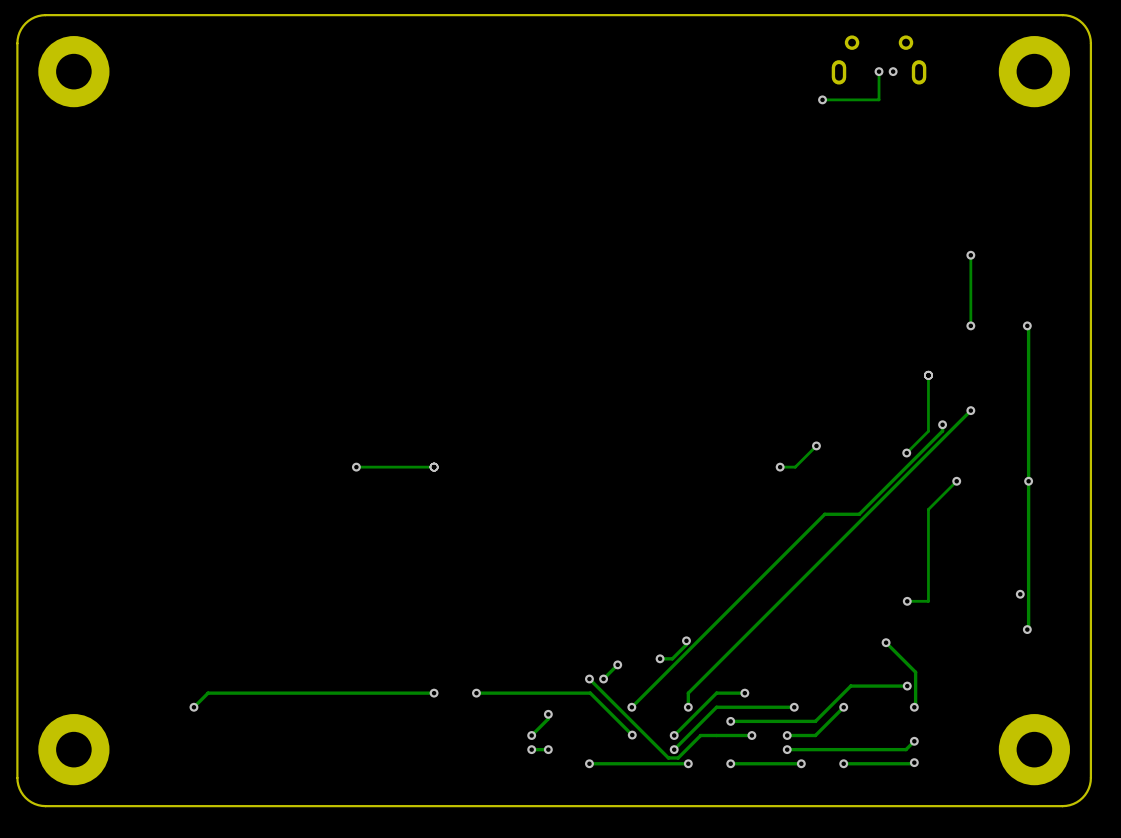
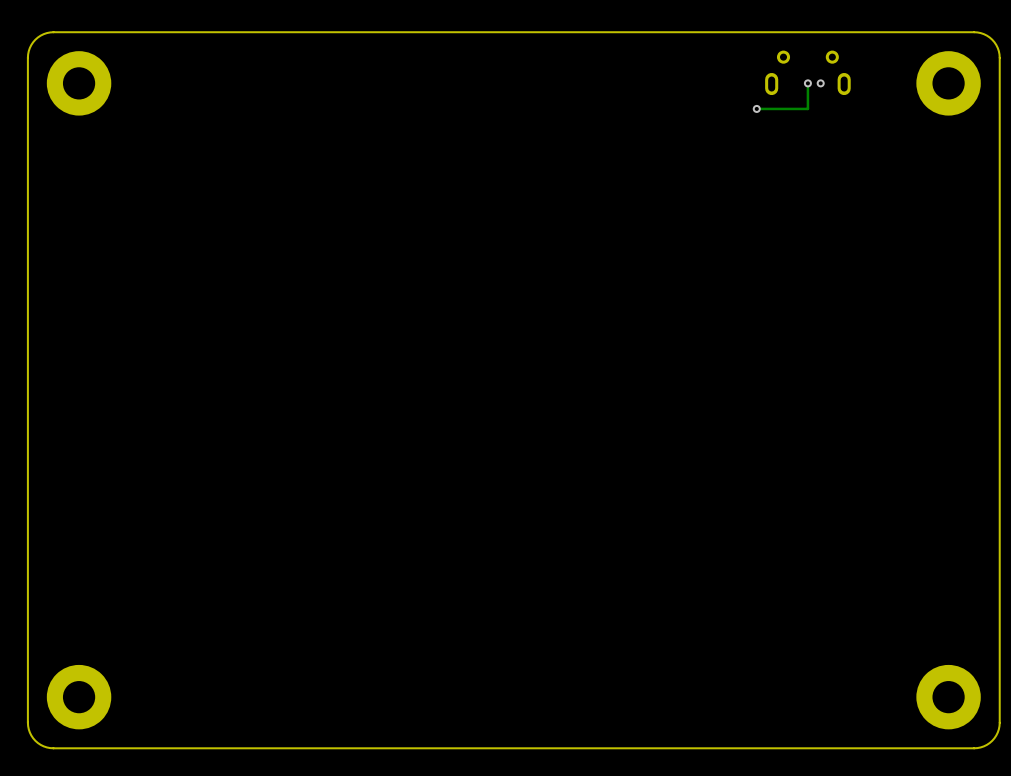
track: (970, 255) (970, 325) -> none
via: (970, 255) -> none
via: (970, 325) -> none
track: (1027, 325) (1027, 629) -> none
via: (1027, 325) -> none
track: (928, 375) (928, 431) (906, 453) -> none
via: (928, 375) -> none
track: (970, 410) (688, 693) (688, 707) -> none
via: (970, 410) -> none
track: (942, 424) (942, 431) (859, 514) (824, 514) (631, 707) -> none
via: (942, 424) -> none
track: (816, 445) (795, 467) (780, 467) -> none
via: (816, 445) -> none
via: (906, 453) -> none
via: (356, 467) -> none
track: (434, 467) (356, 467) -> none
via: (434, 467) -> none
via: (780, 467) -> none
track: (956, 481) (928, 509) (928, 601) (907, 601) -> none
via: (956, 481) -> none
via: (1028, 481) -> none
via: (1020, 594) -> none
via: (907, 601) -> none
via: (1027, 629) -> none
track: (686, 640) (686, 644) (672, 658) (660, 658) -> none
via: (686, 640) -> none
track: (886, 642) (915, 672) (914, 707) -> none
via: (886, 642) -> none
via: (660, 658) -> none
track: (617, 664) (603, 679) -> none
via: (617, 664) -> none
track: (589, 679) (668, 757) (678, 757) (700, 735) (751, 735) -> none
via: (589, 679) -> none
via: (603, 679) -> none
track: (907, 686) (850, 686) (815, 721) (730, 721) -> none
via: (907, 686) -> none
track: (434, 693) (208, 693) (193, 707) -> none
via: (434, 693) -> none
track: (476, 693) (590, 693) (632, 735) -> none
via: (476, 693) -> none
track: (744, 693) (716, 693) (674, 735) -> none
via: (744, 693) -> none
via: (193, 707) -> none
via: (631, 707) -> none
via: (688, 707) -> none
track: (794, 707) (716, 707) (674, 749) -> none
via: (794, 707) -> none
track: (843, 707) (815, 735) (787, 735) -> none
via: (843, 707) -> none
via: (914, 707) -> none
track: (548, 714) (548, 718) (531, 735) -> none
via: (548, 714) -> none
via: (730, 721) -> none
via: (531, 735) -> none
via: (632, 735) -> none
via: (674, 735) -> none
via: (751, 735) -> none
via: (787, 735) -> none
track: (914, 741) (905, 749) (787, 749) -> none
via: (914, 741) -> none
via: (531, 749) -> none
track: (548, 749) (531, 749) -> none
via: (548, 749) -> none
via: (674, 749) -> none
via: (787, 749) -> none
track: (914, 762) (843, 763) -> none
via: (914, 762) -> none
via: (589, 763) -> none
track: (688, 763) (589, 763) -> none
via: (688, 763) -> none
via: (730, 763) -> none
track: (801, 763) (730, 763) -> none
via: (801, 763) -> none
via: (843, 763) -> none

